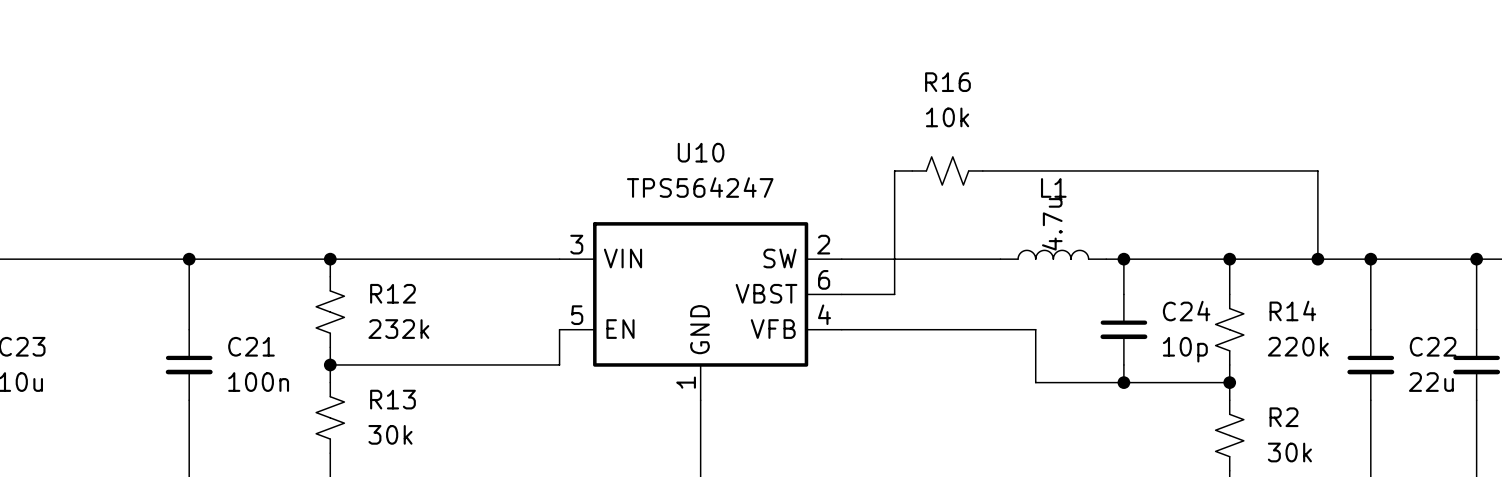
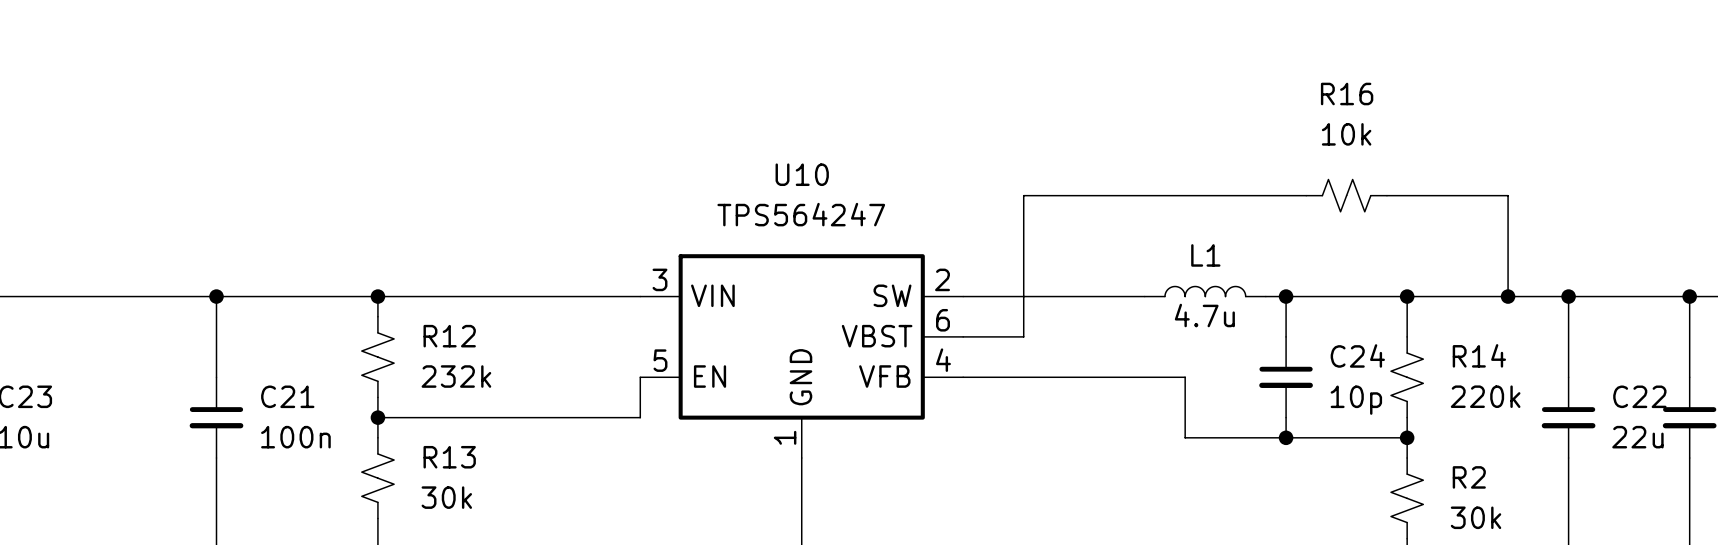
R16 position: (947, 170) -> (1346, 195)
wire: (1141, 170) (1212, 170) -> (1043, 195) (1124, 195)
L1 name position: L1 (1053, 187) -> L1 (1205, 255)
L1 value rotation: 0° (1052, 224) -> 90° clockwise (1204, 315)

